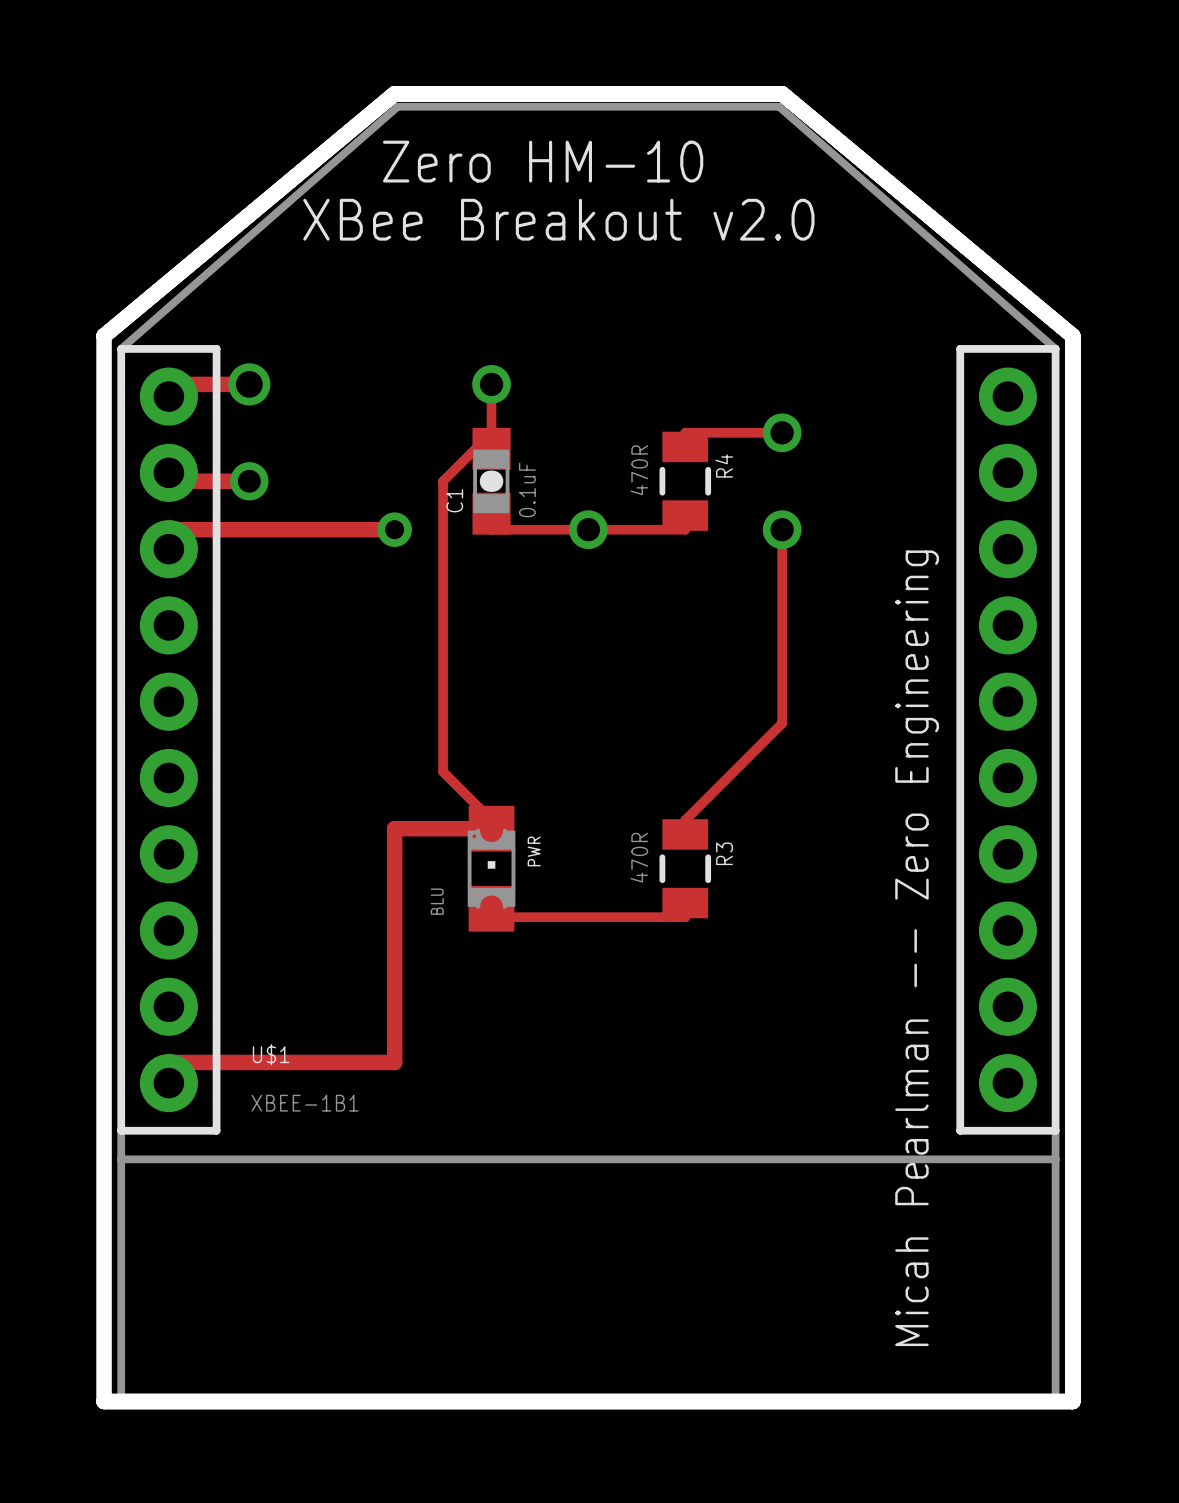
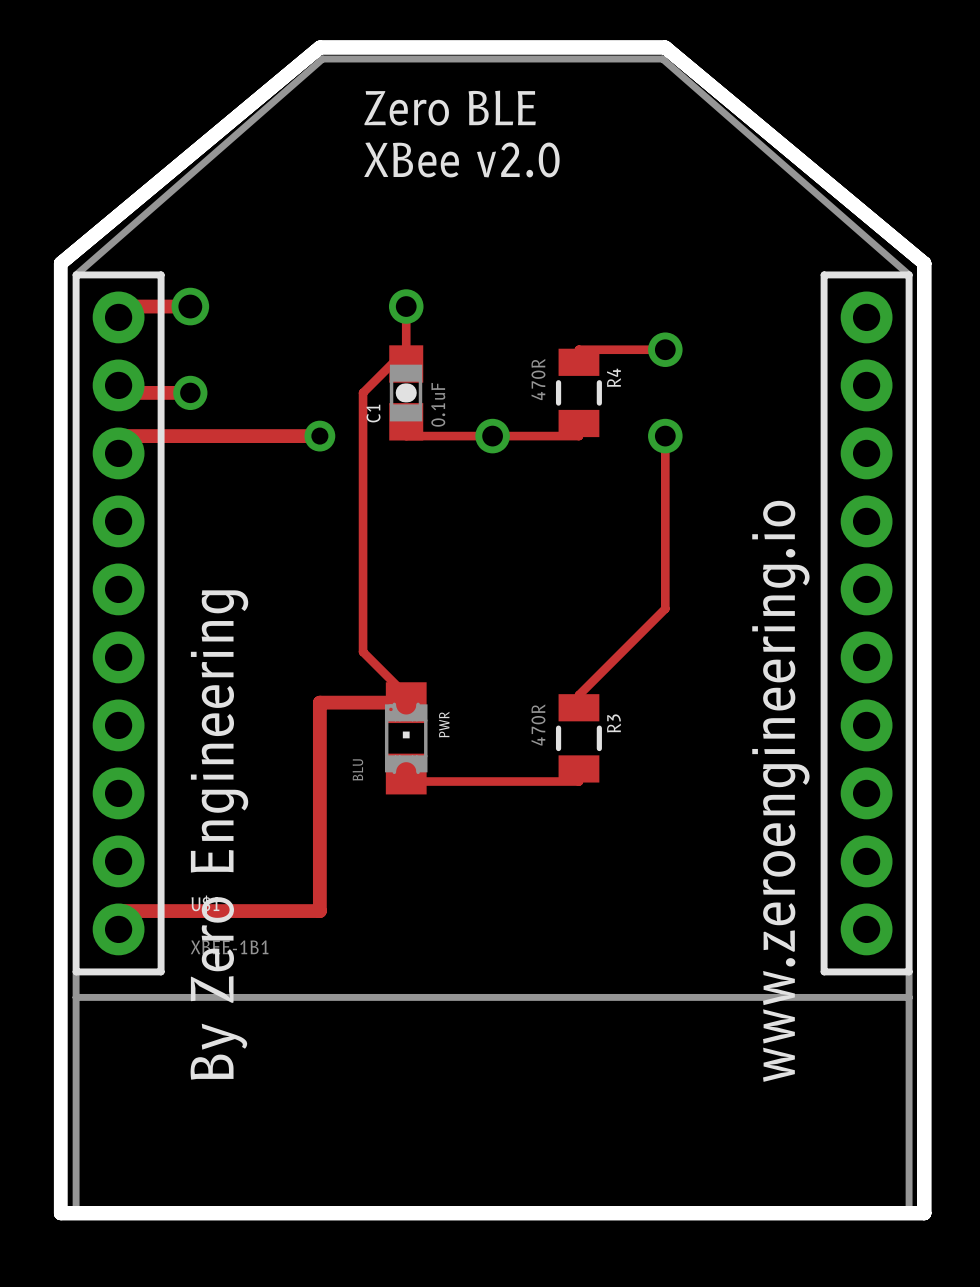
text: Zero HM-10 (543, 161) -> none
text: none -> Zero BLE (450, 108)
text: XBee Breakout v2.0 (558, 219) -> XBee v2.0 (461, 159)
text: none -> www.zeroengineering.io (780, 791)
text: none -> By Zero Engineering (219, 835)
text: Micah Pearlman -- Zero Engineering (917, 948) -> none

